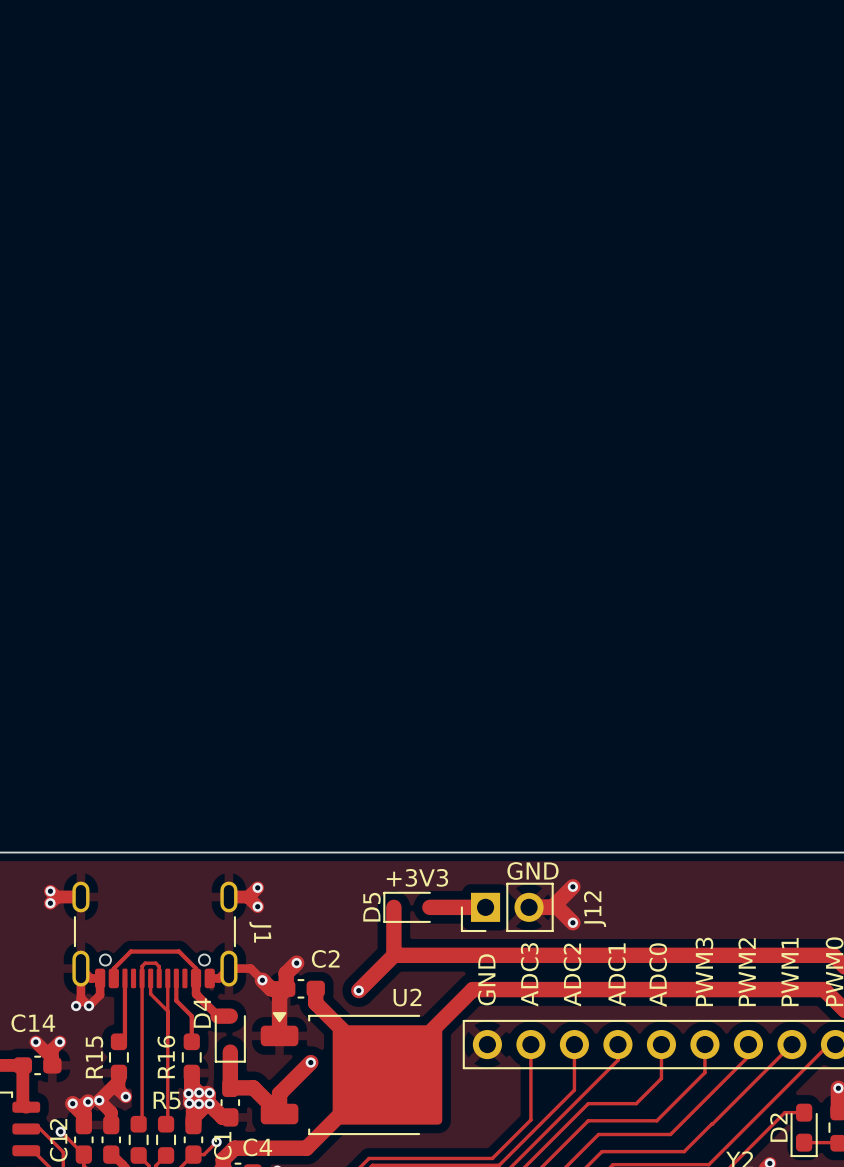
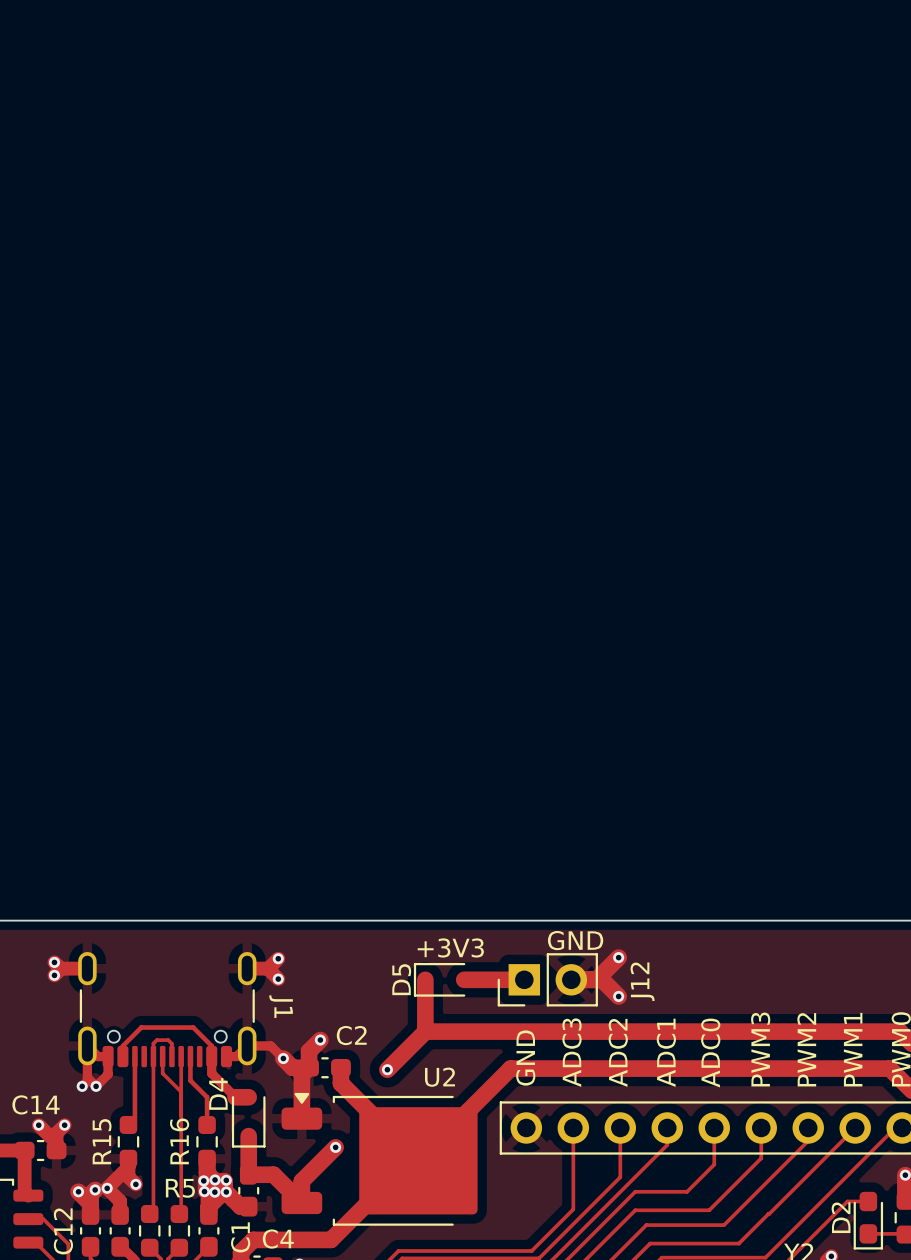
track: (60, 1131) (83, 1154) -> none
via: (60, 1131) -> none
track: (216, 1142) (204, 1154) (193, 1154) -> none
via: (216, 1142) -> none

